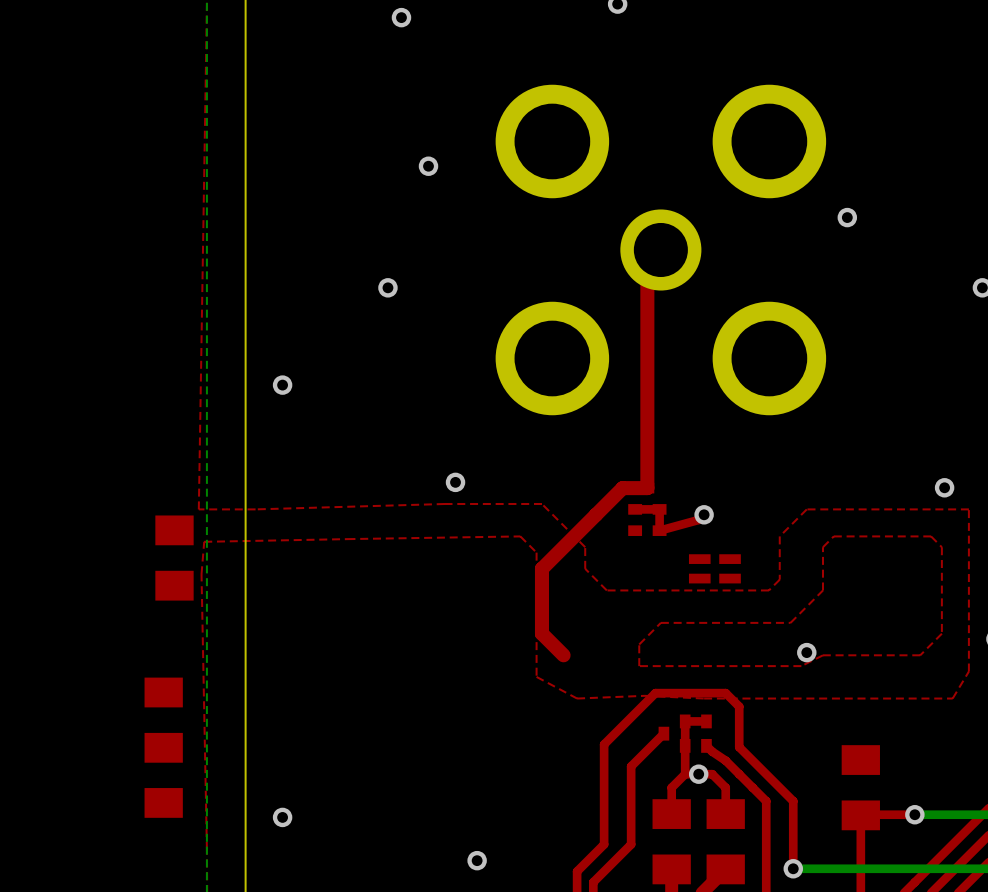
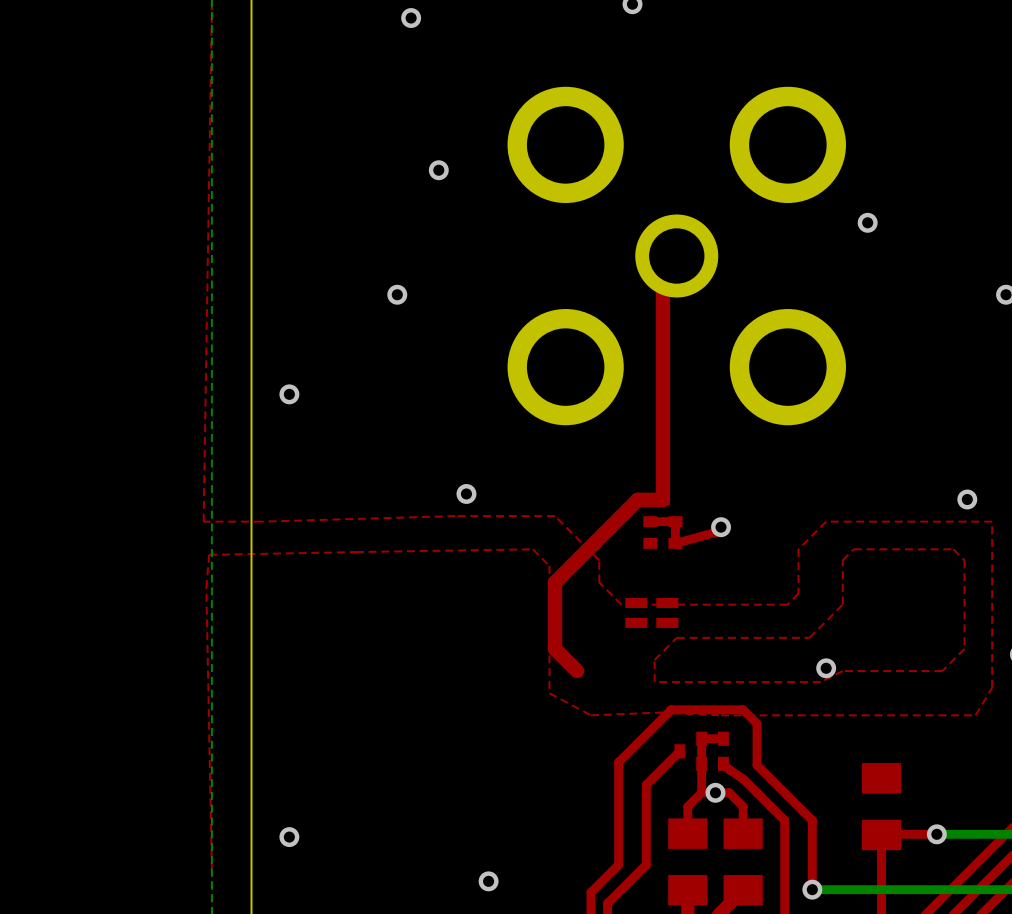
part: (174, 558) -> none
part position: (714, 568) -> (651, 612)
part: (163, 747) -> none

